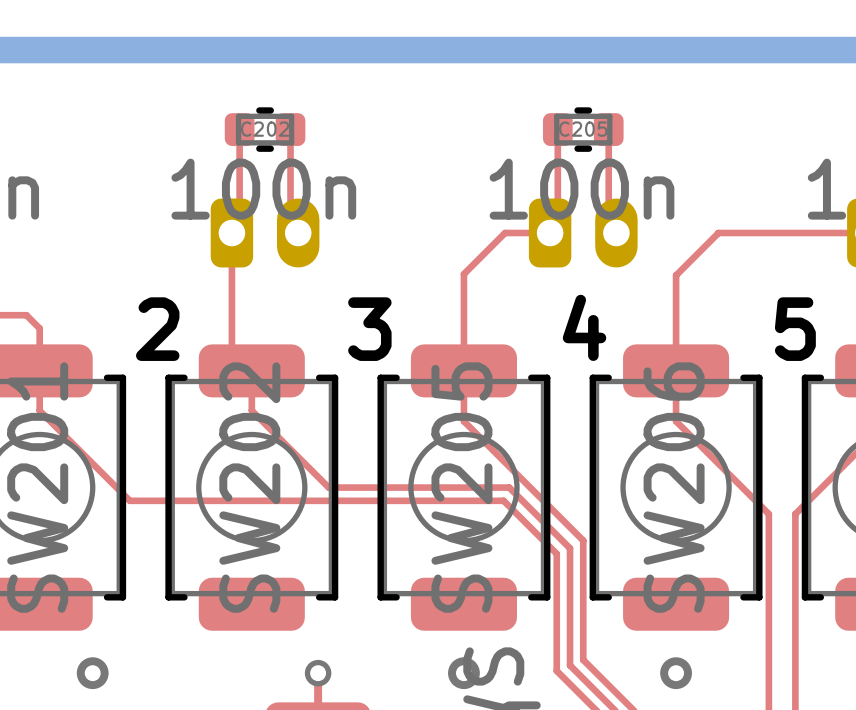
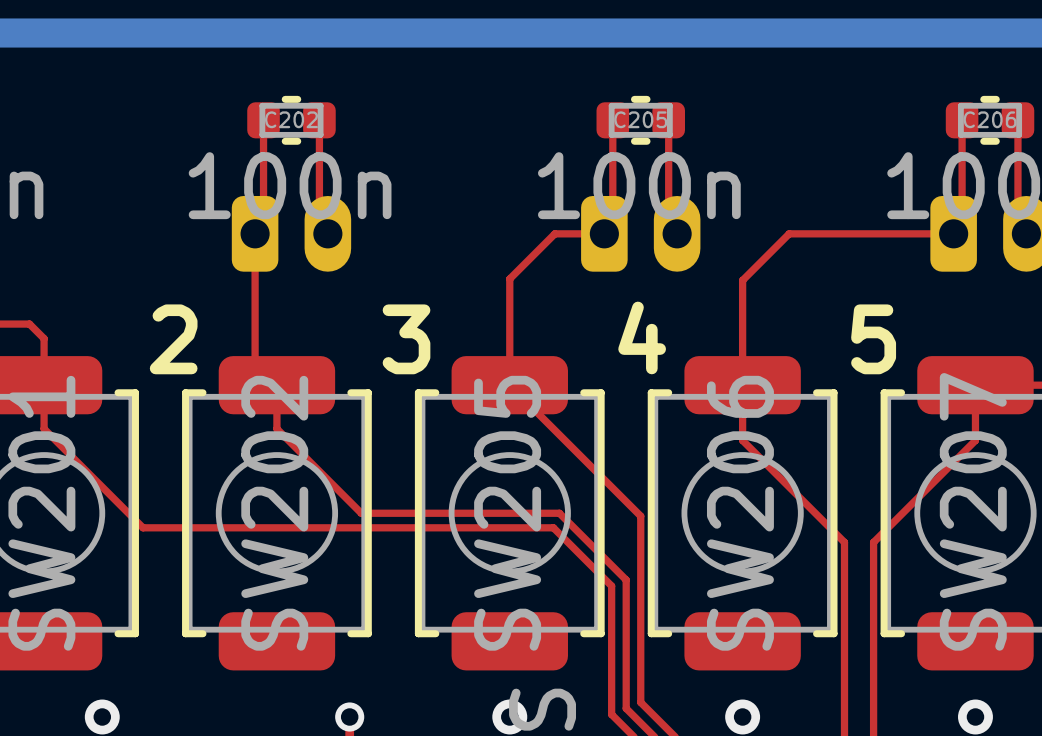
top track: (463, 370) (463, 421) (583, 540) -> (509, 385) (640, 516) (640, 571)

